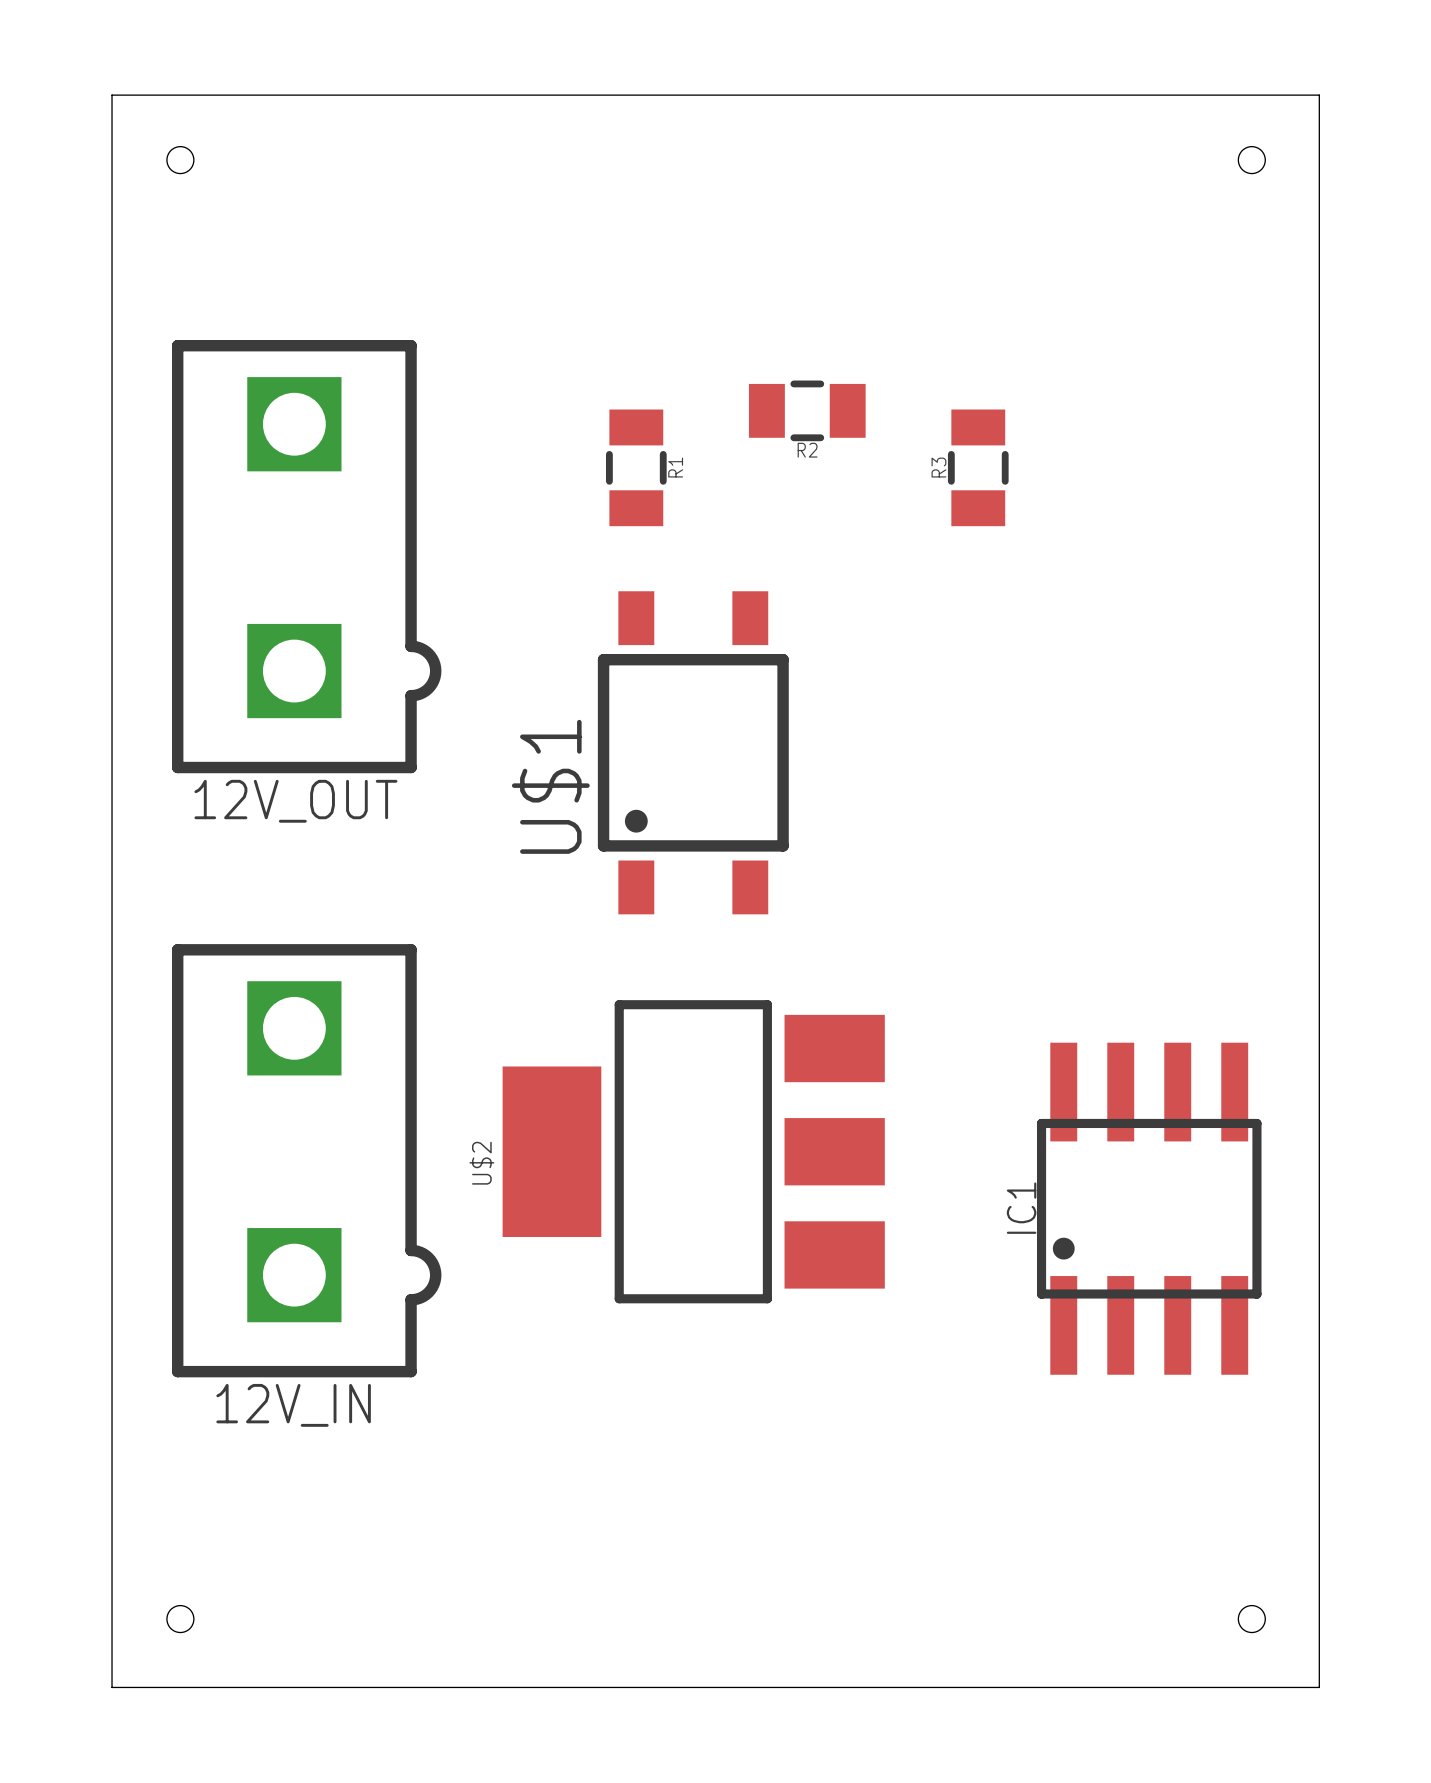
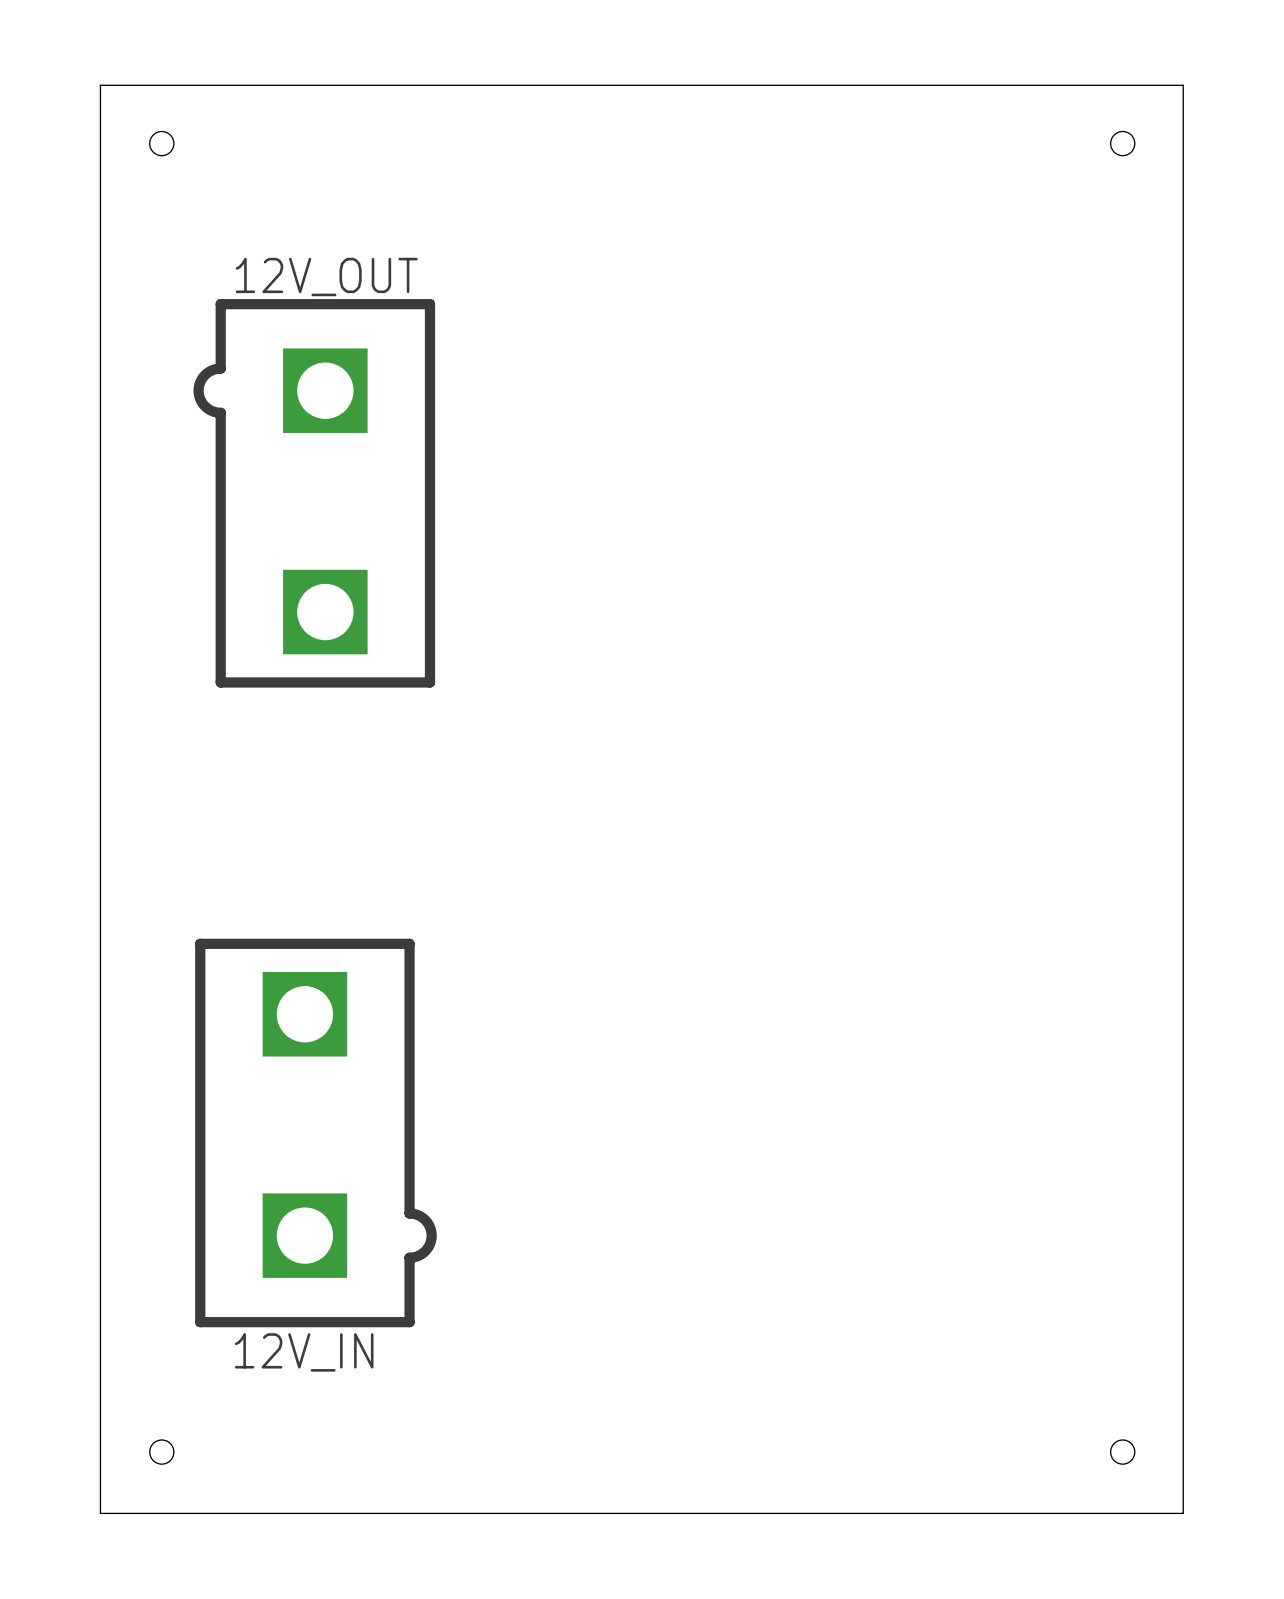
R2: (807, 410) -> none
R1: (636, 467) -> none
R3: (978, 467) -> none
12V_OUT rotation: 0° (306, 556) -> 180° (314, 493)
U$1: (693, 752) -> none
U$2: (693, 1151) -> none
12V_IN position: (306, 1160) -> (315, 1132)
IC1: (1149, 1208) -> none

